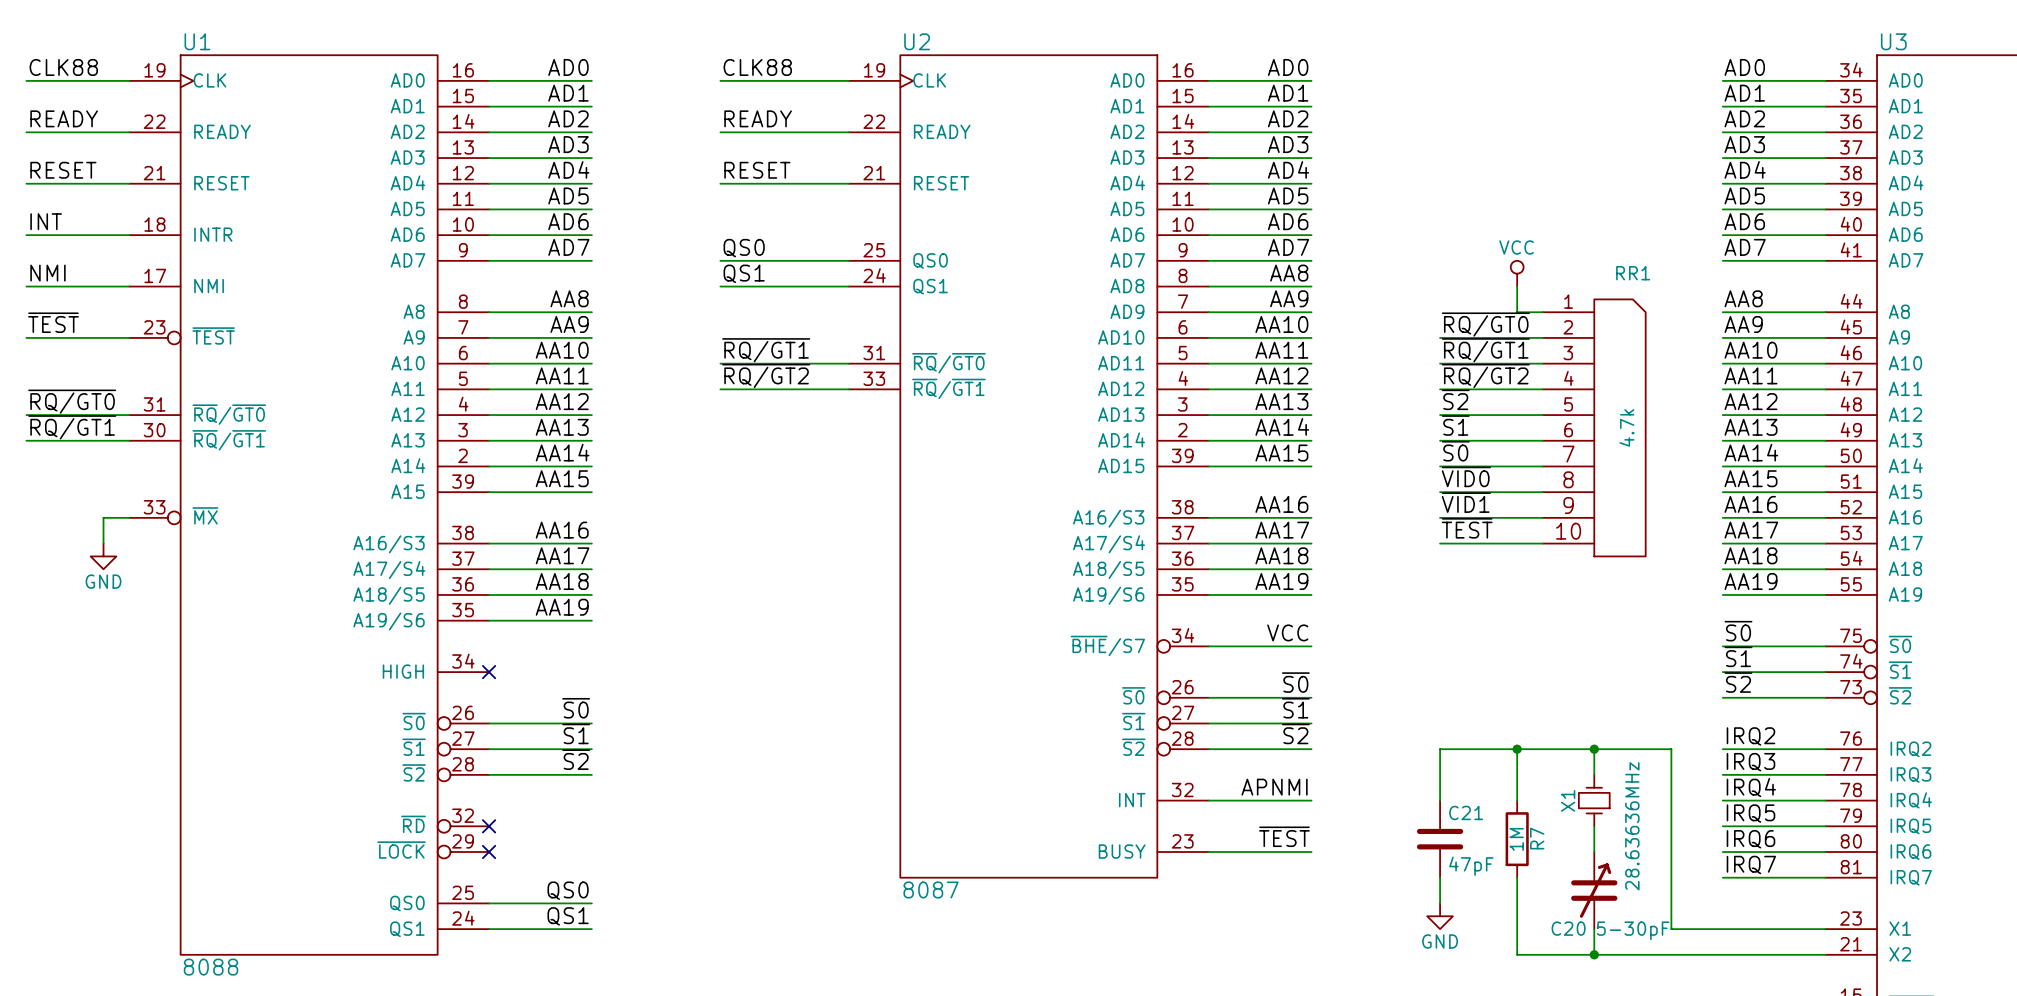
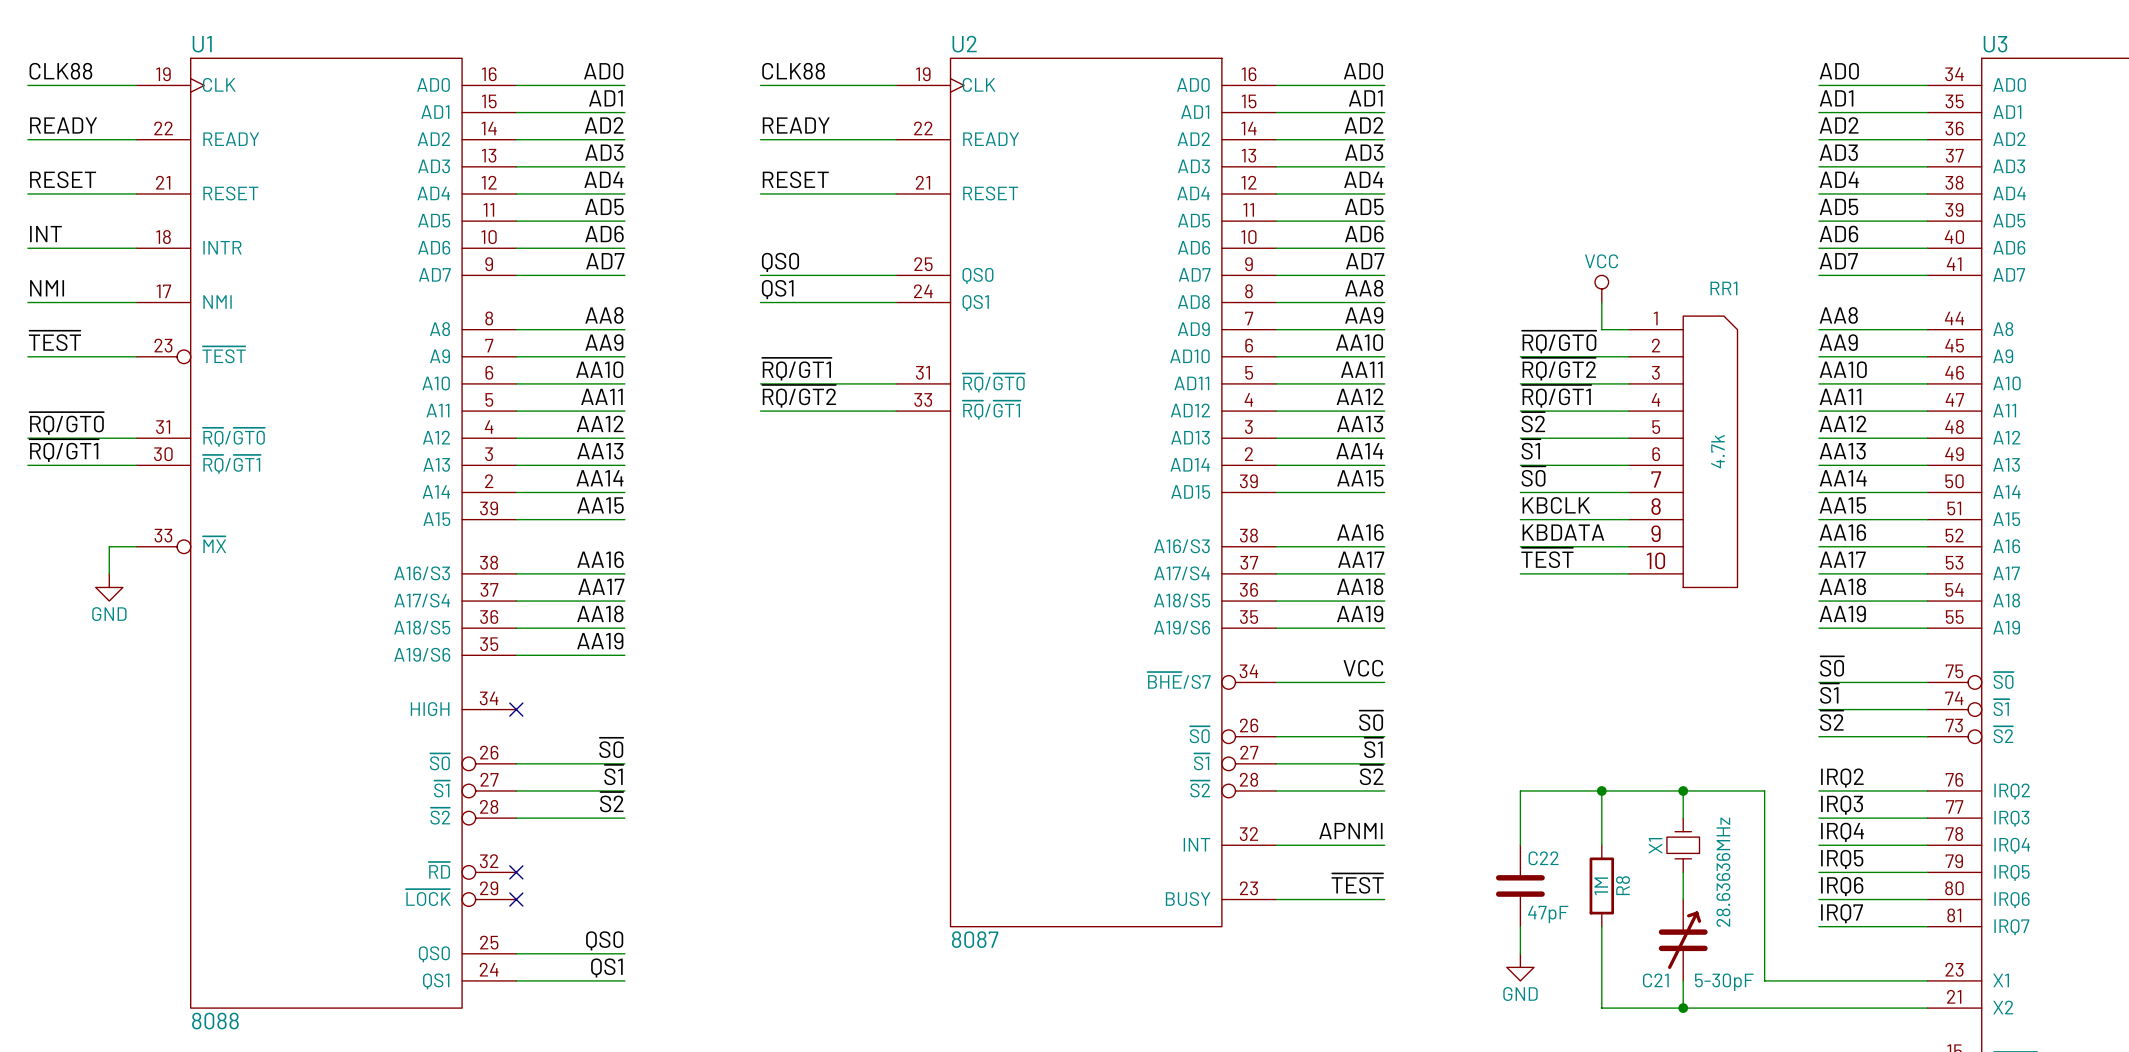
label: ~{RQ/GT1} (1485, 350) -> ~{RQ/GT2} (1558, 369)
label: ~{RQ/GT2} (1485, 375) -> ~{RQ/GT1} (1556, 396)
label: ~{VID0} (1466, 476) -> KBCLK (1556, 505)
label: ~{VID1} (1466, 502) -> KBDATA (1563, 532)
C21 name: C21 (1466, 812) -> C22 (1543, 858)
R7 name: R7 (1537, 838) -> R8 (1622, 885)
C20 name: C20 (1568, 928) -> C21 (1655, 980)

